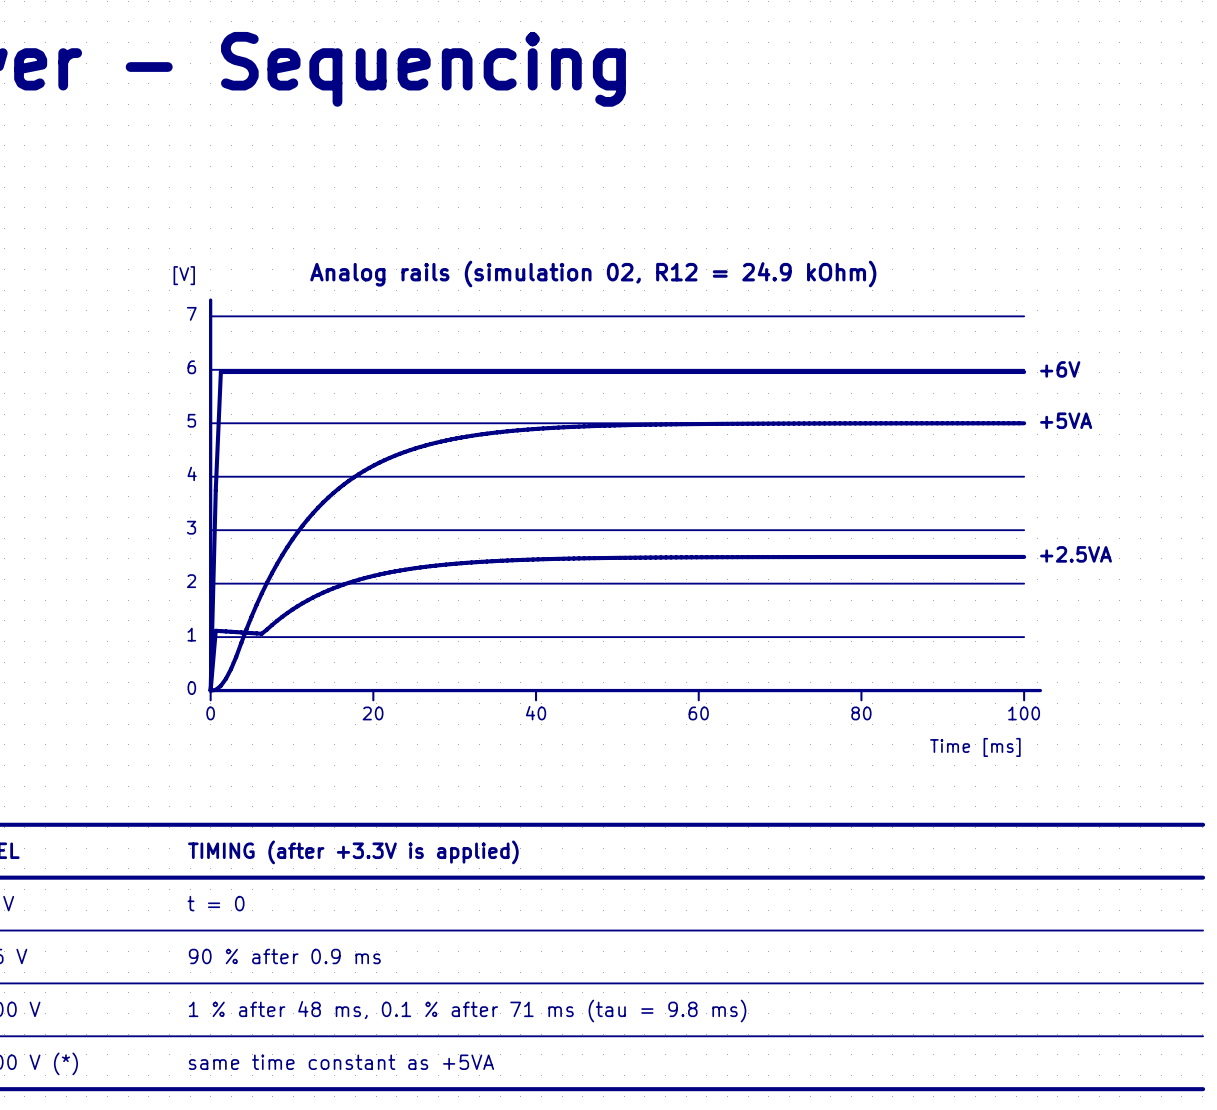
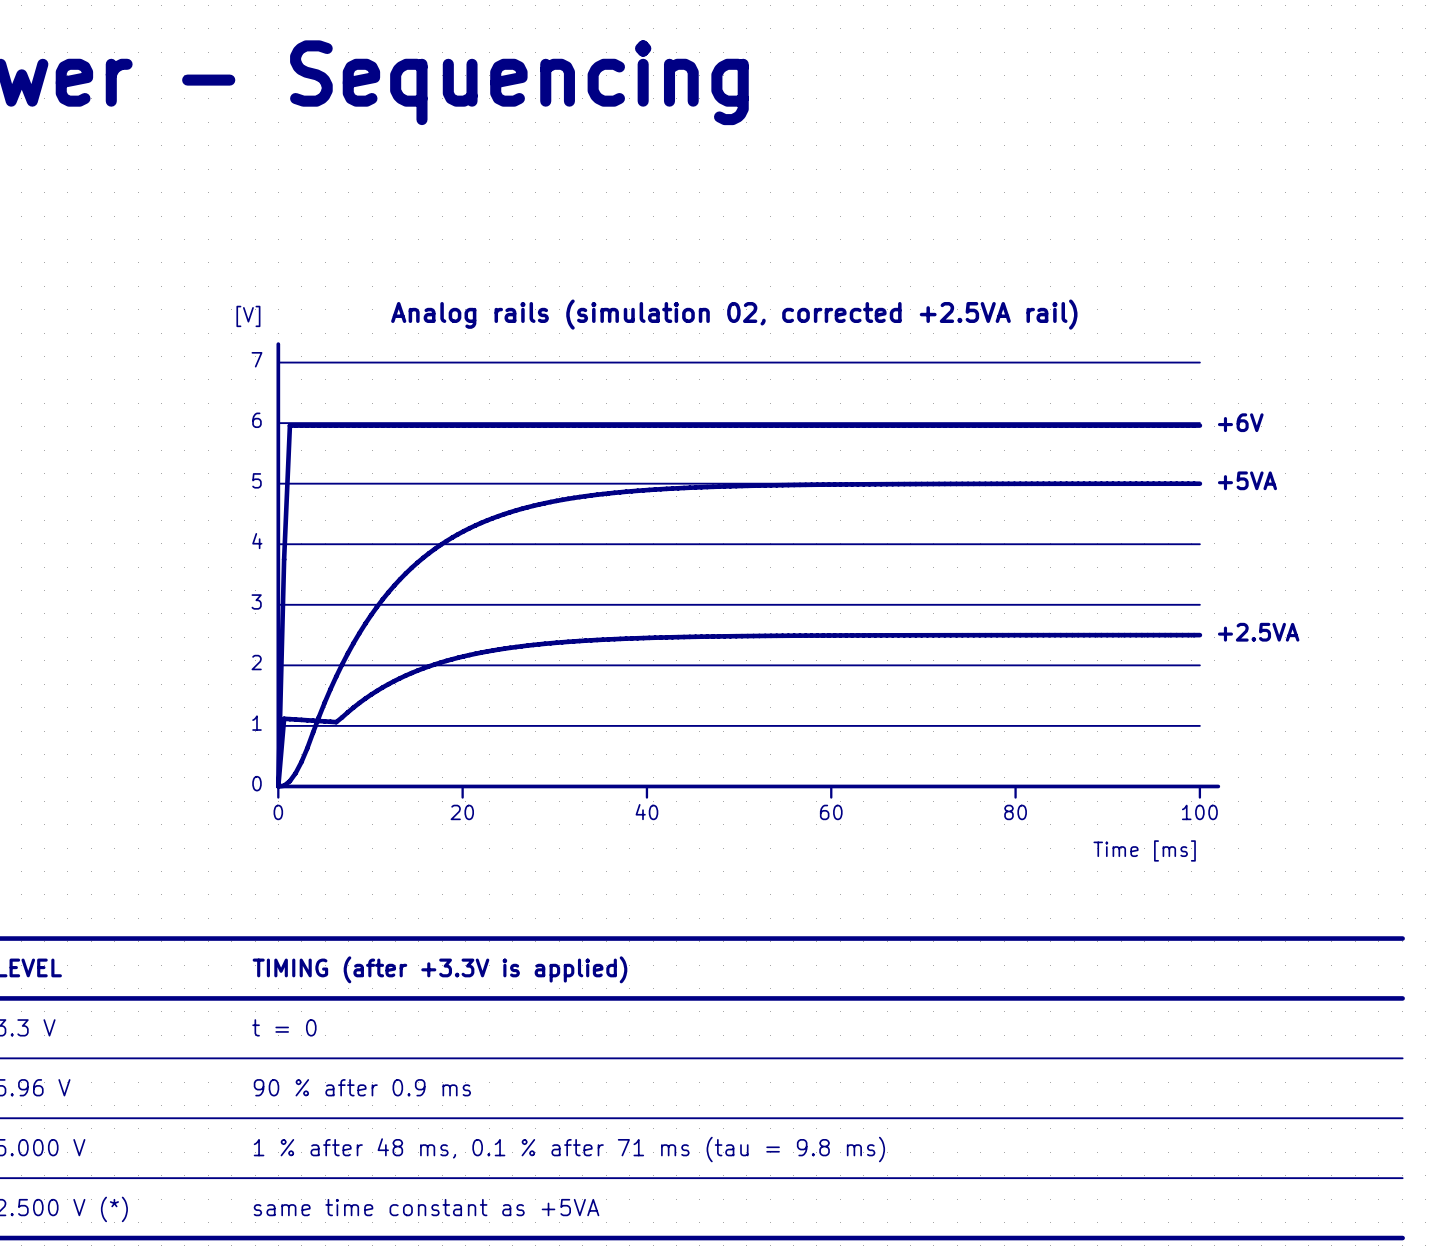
text: Analog rails (simulation 02, R12 = 24.9 kOhm) (593, 274) -> Analog rails (simulation 02, corrected +2.5VA rail) (734, 314)

